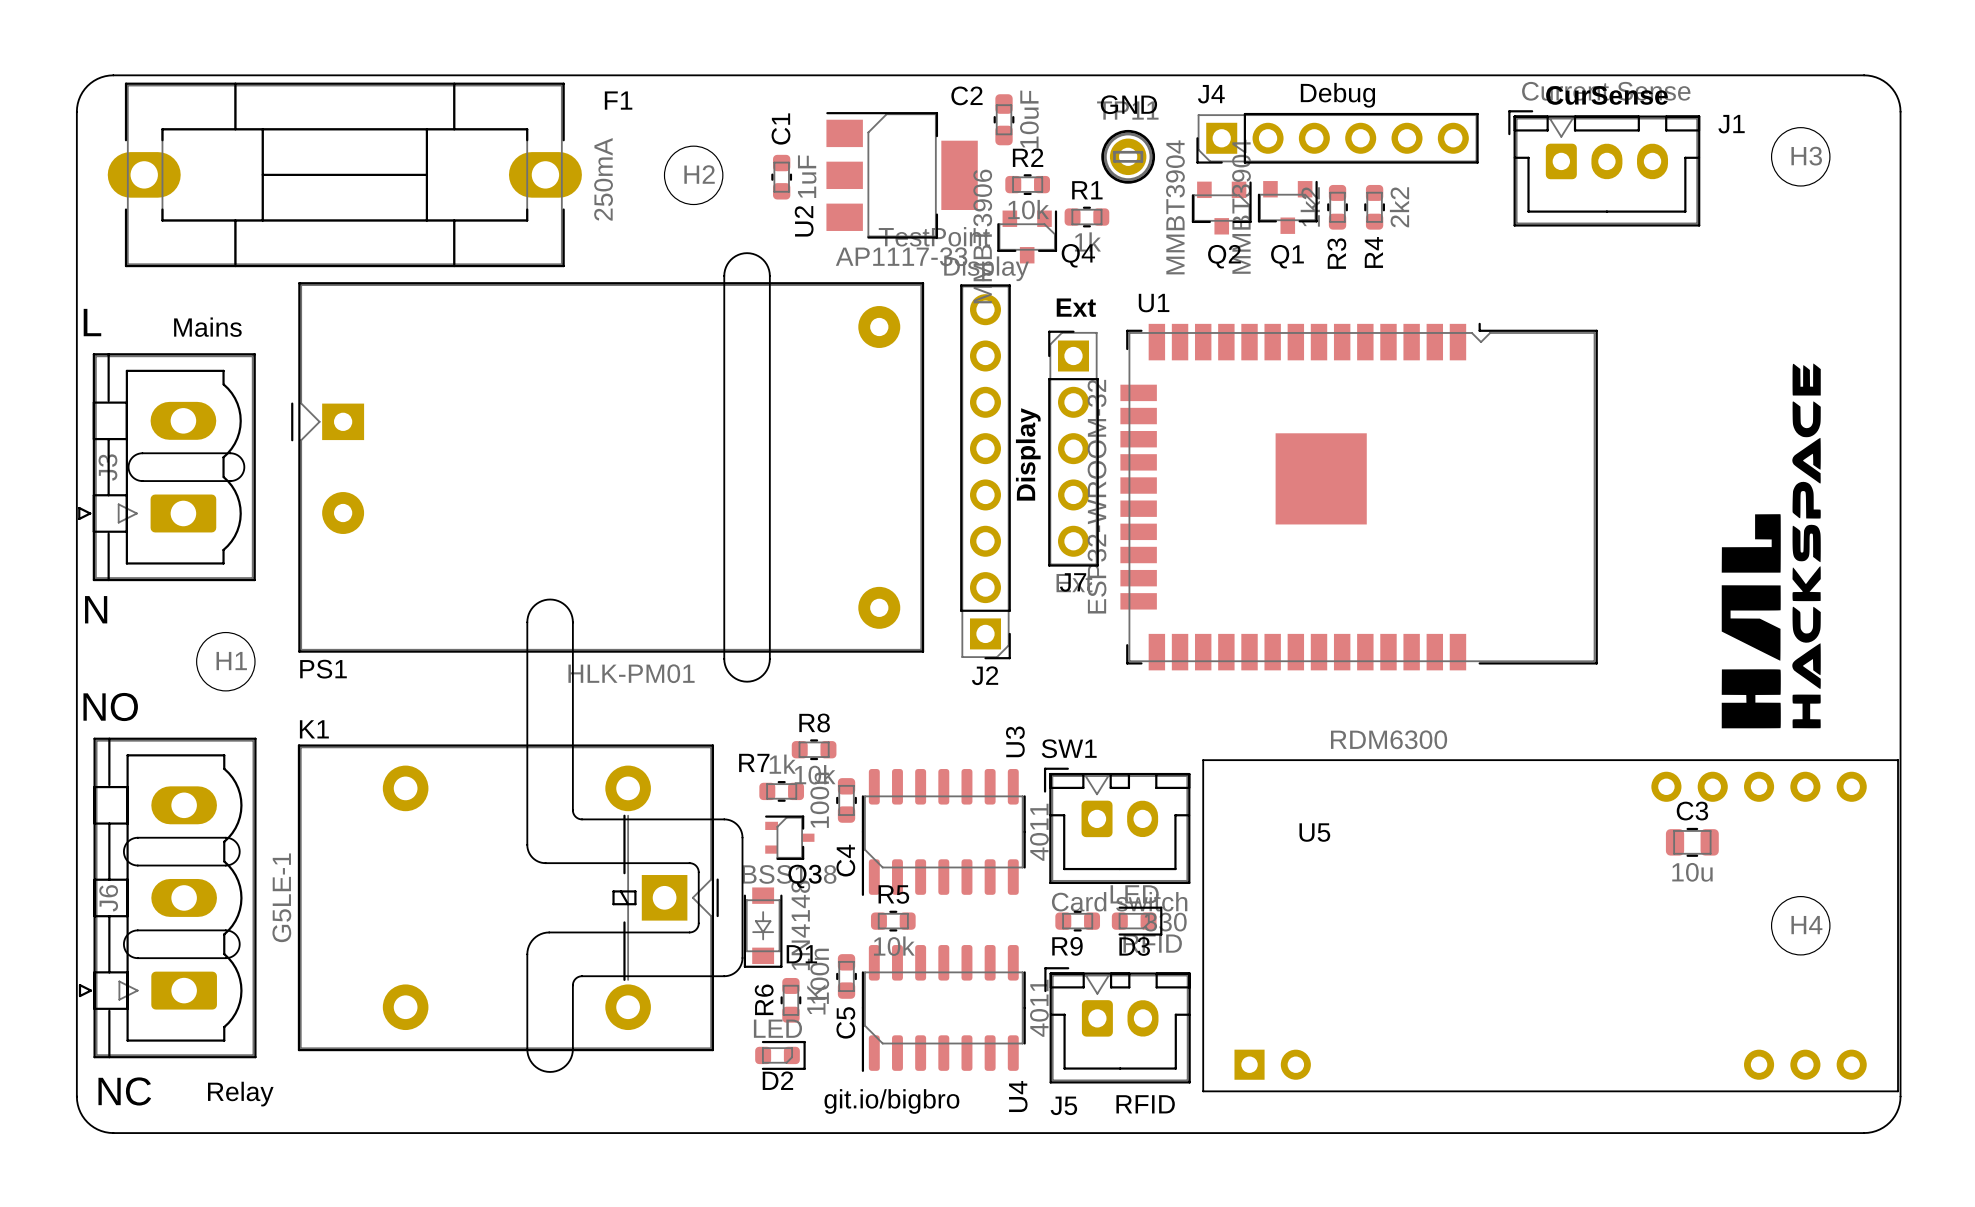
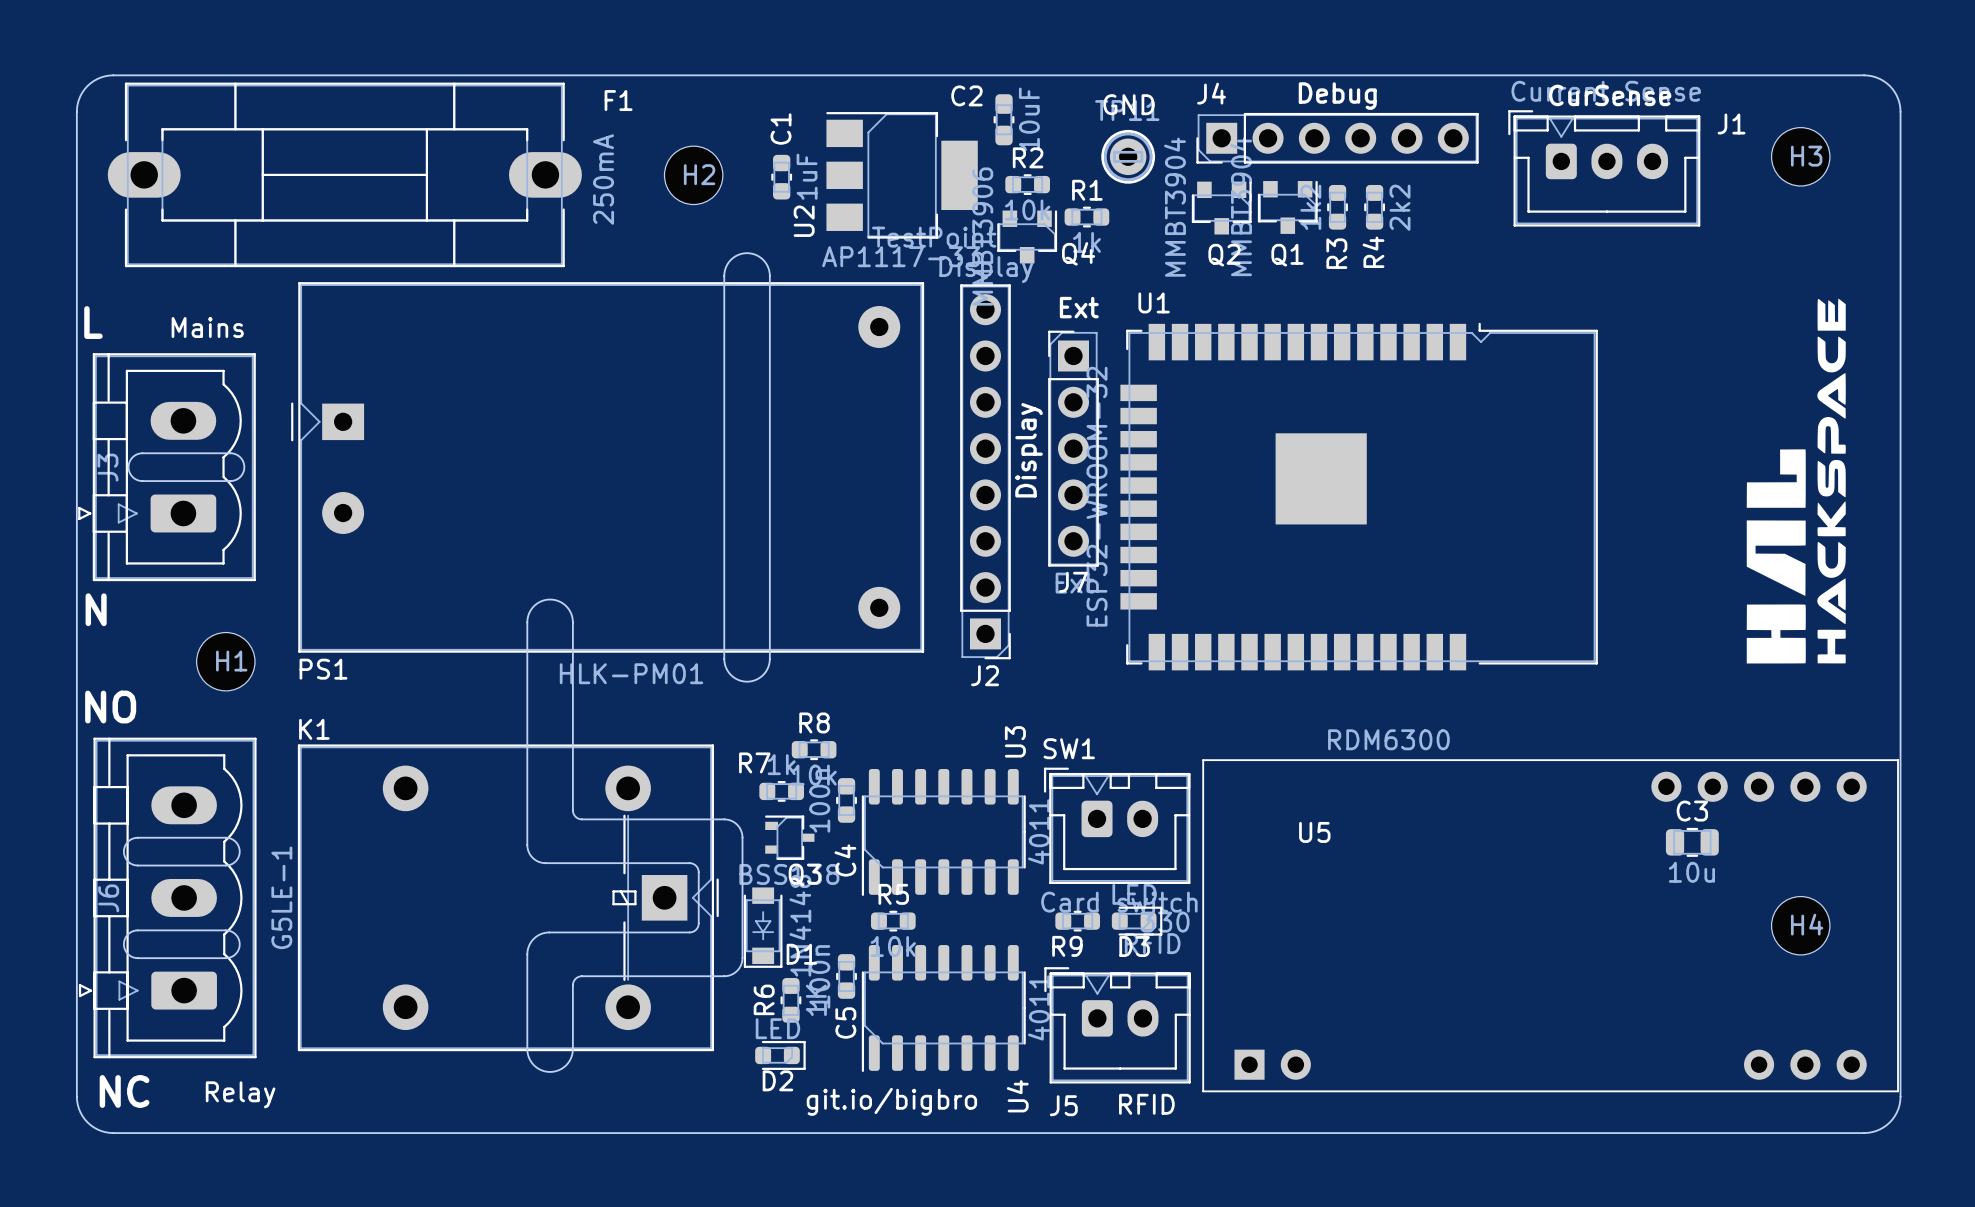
drawing position: (1771, 545) -> (1796, 481)

